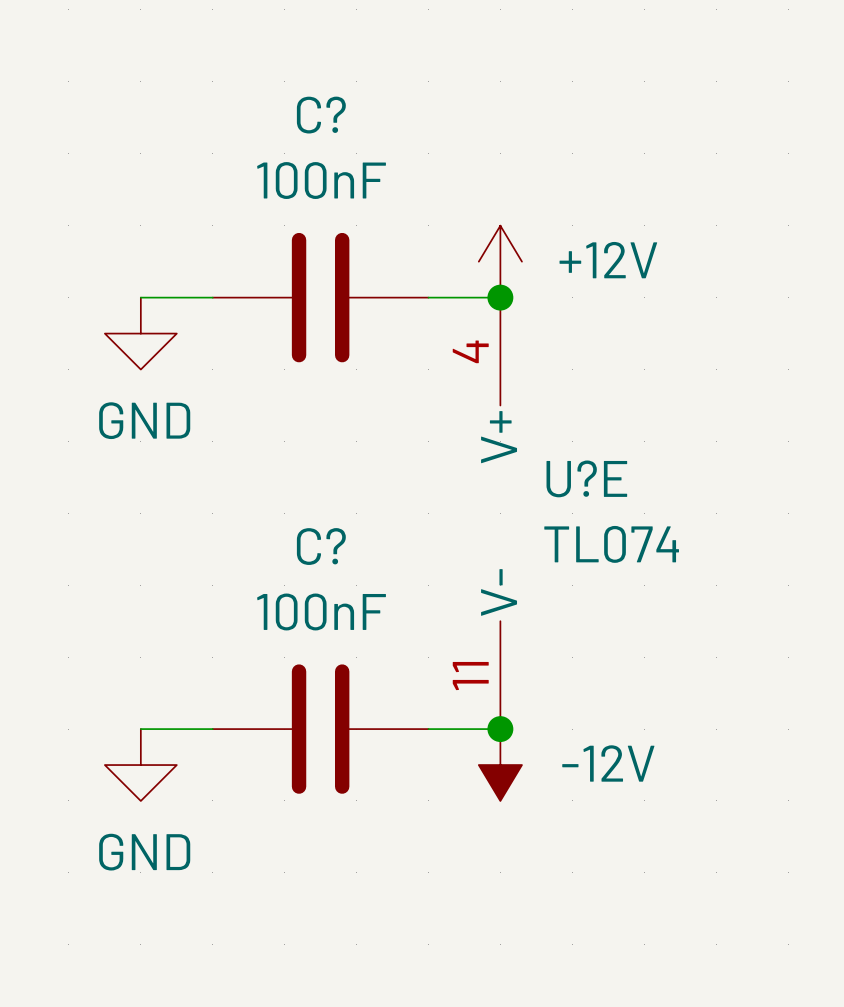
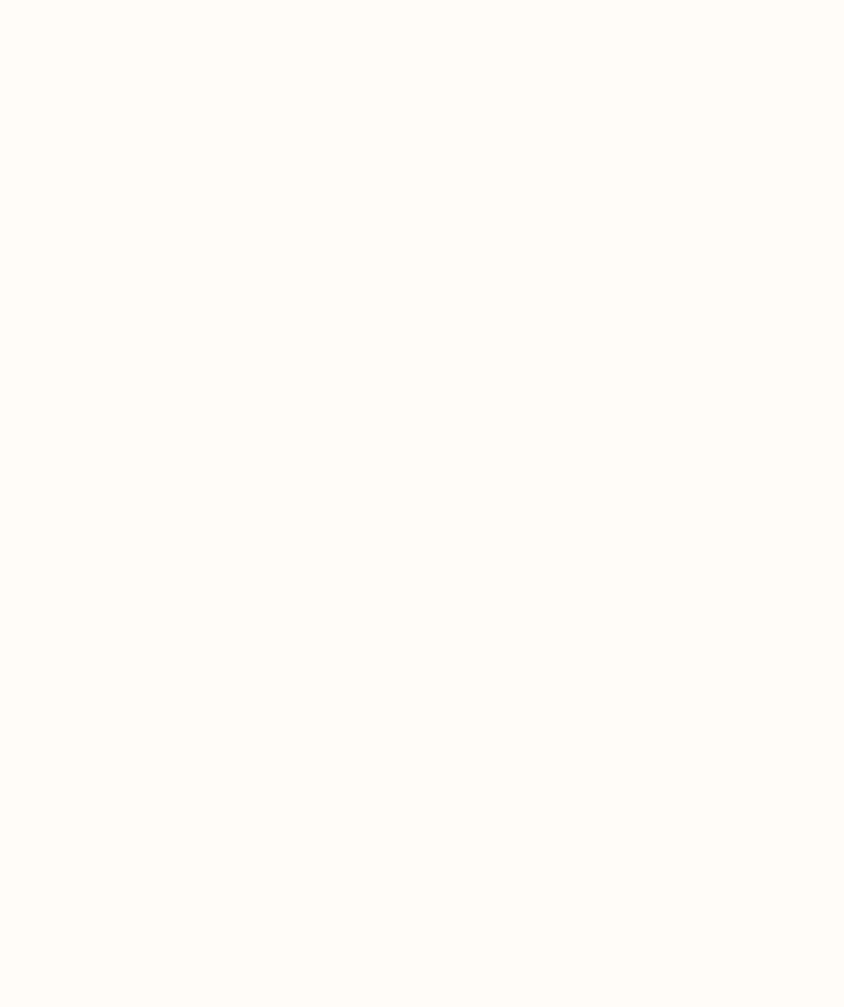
power symbol: +12V (500, 261) -> none
wire: (140, 297) (212, 297) -> none
C?: 100nF (320, 297) -> none
wire: (428, 297) (500, 297) -> none
junction: (500, 297) -> none
power symbol: GND (140, 333) -> none
U?E: TL074 (500, 513) -> none
wire: (140, 729) (212, 729) -> none
C?: 100nF (320, 729) -> none
wire: (428, 729) (500, 729) -> none
junction: (500, 729) -> none
power symbol: GND (140, 765) -> none
power symbol: -12V (500, 765) -> none

